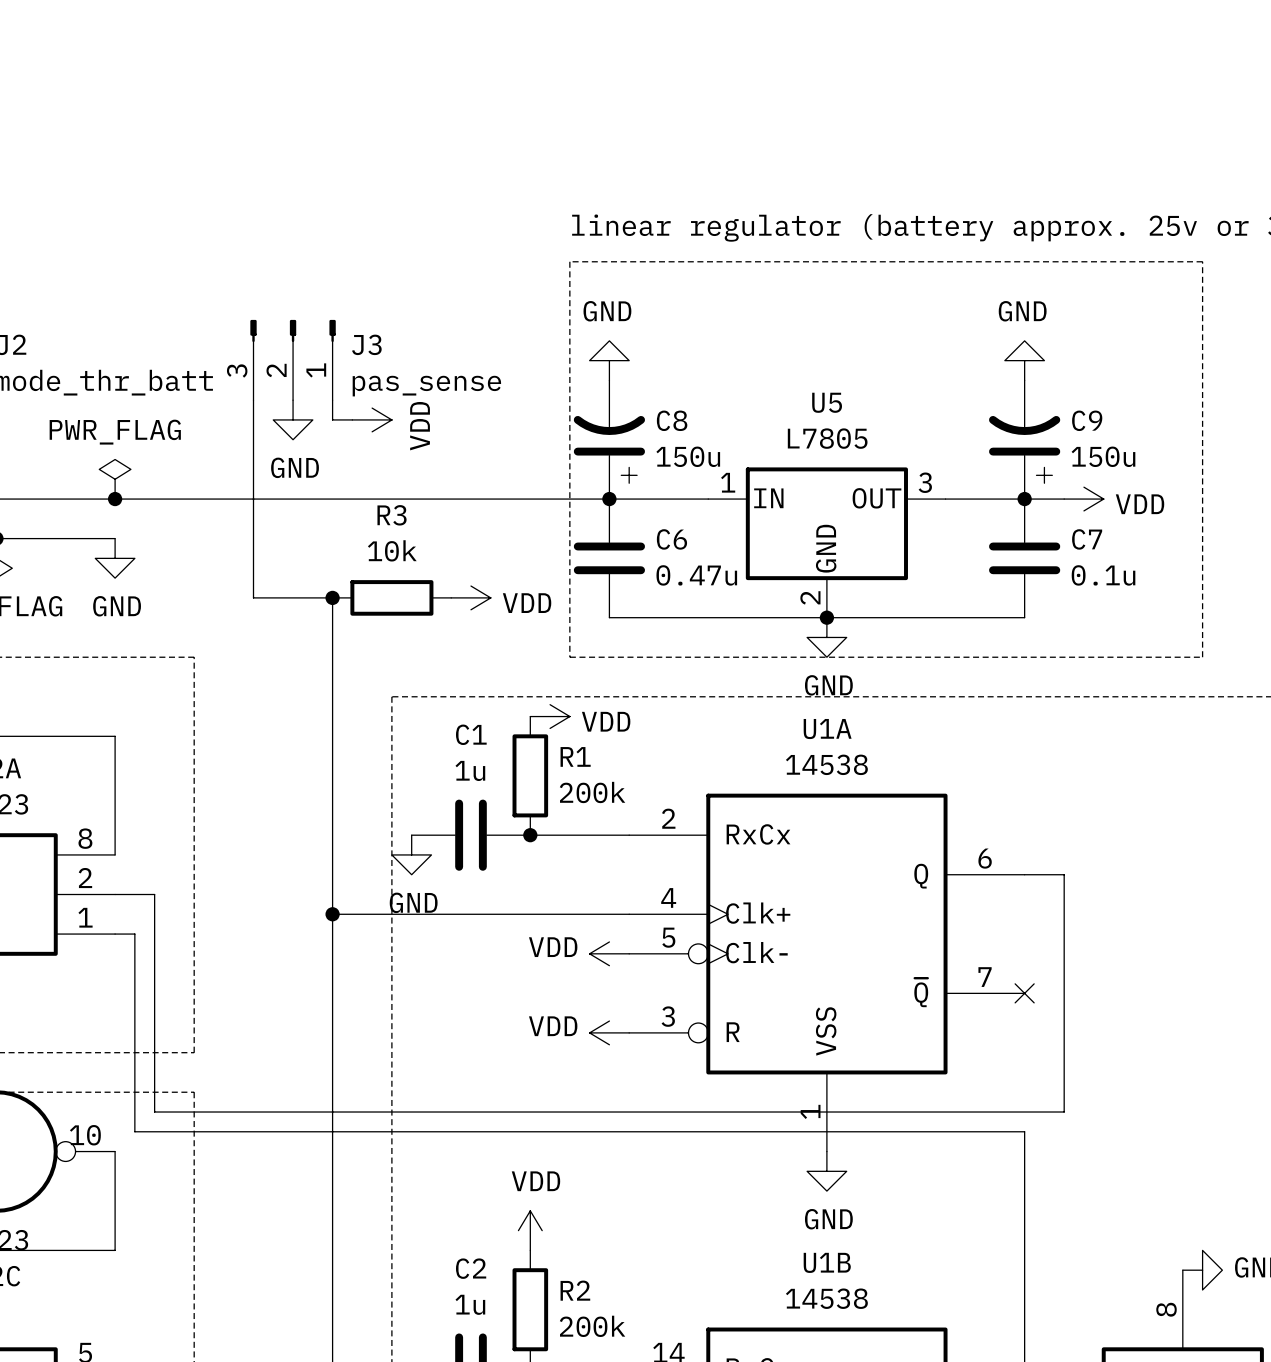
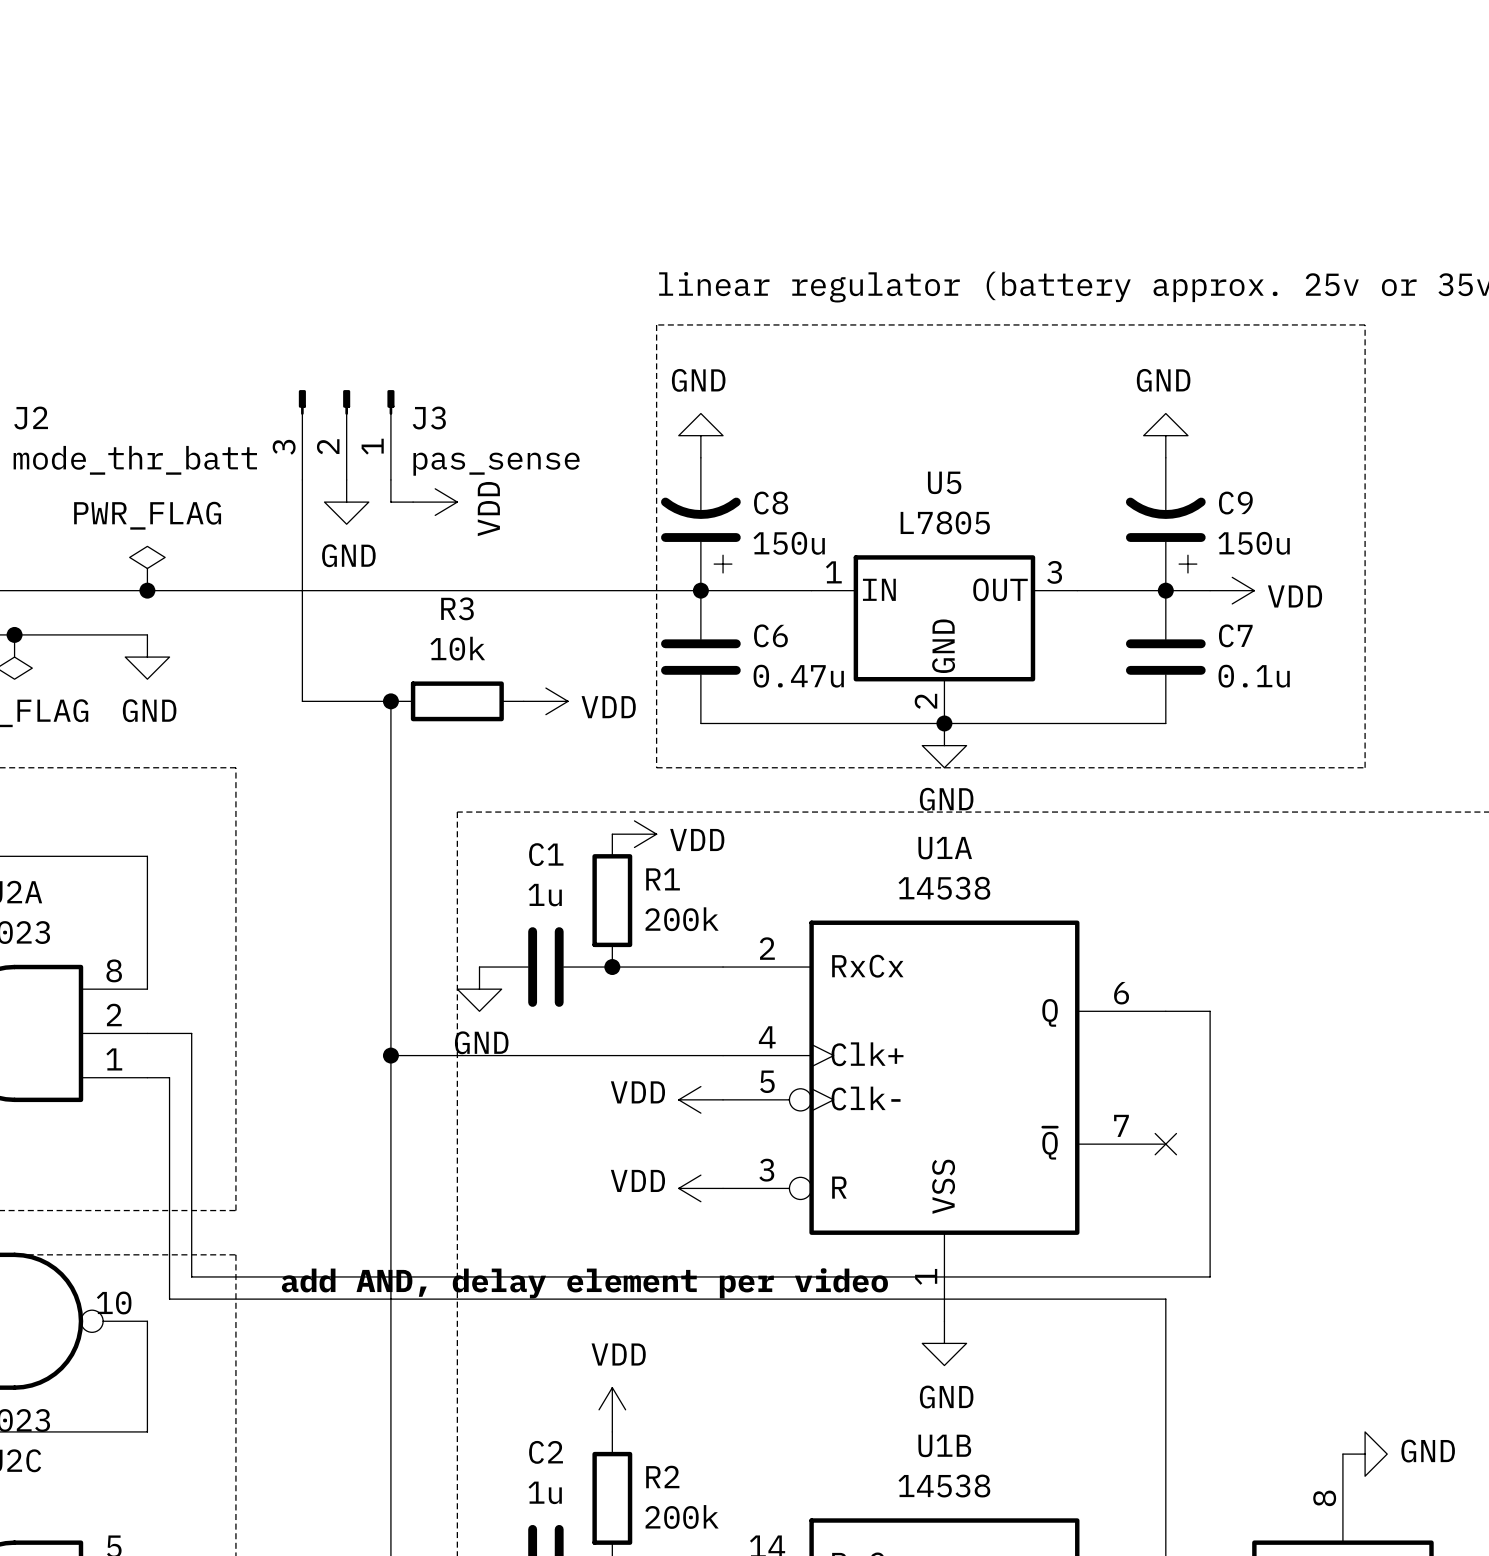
text: none -> add AND, delay element per video (584, 1283)

